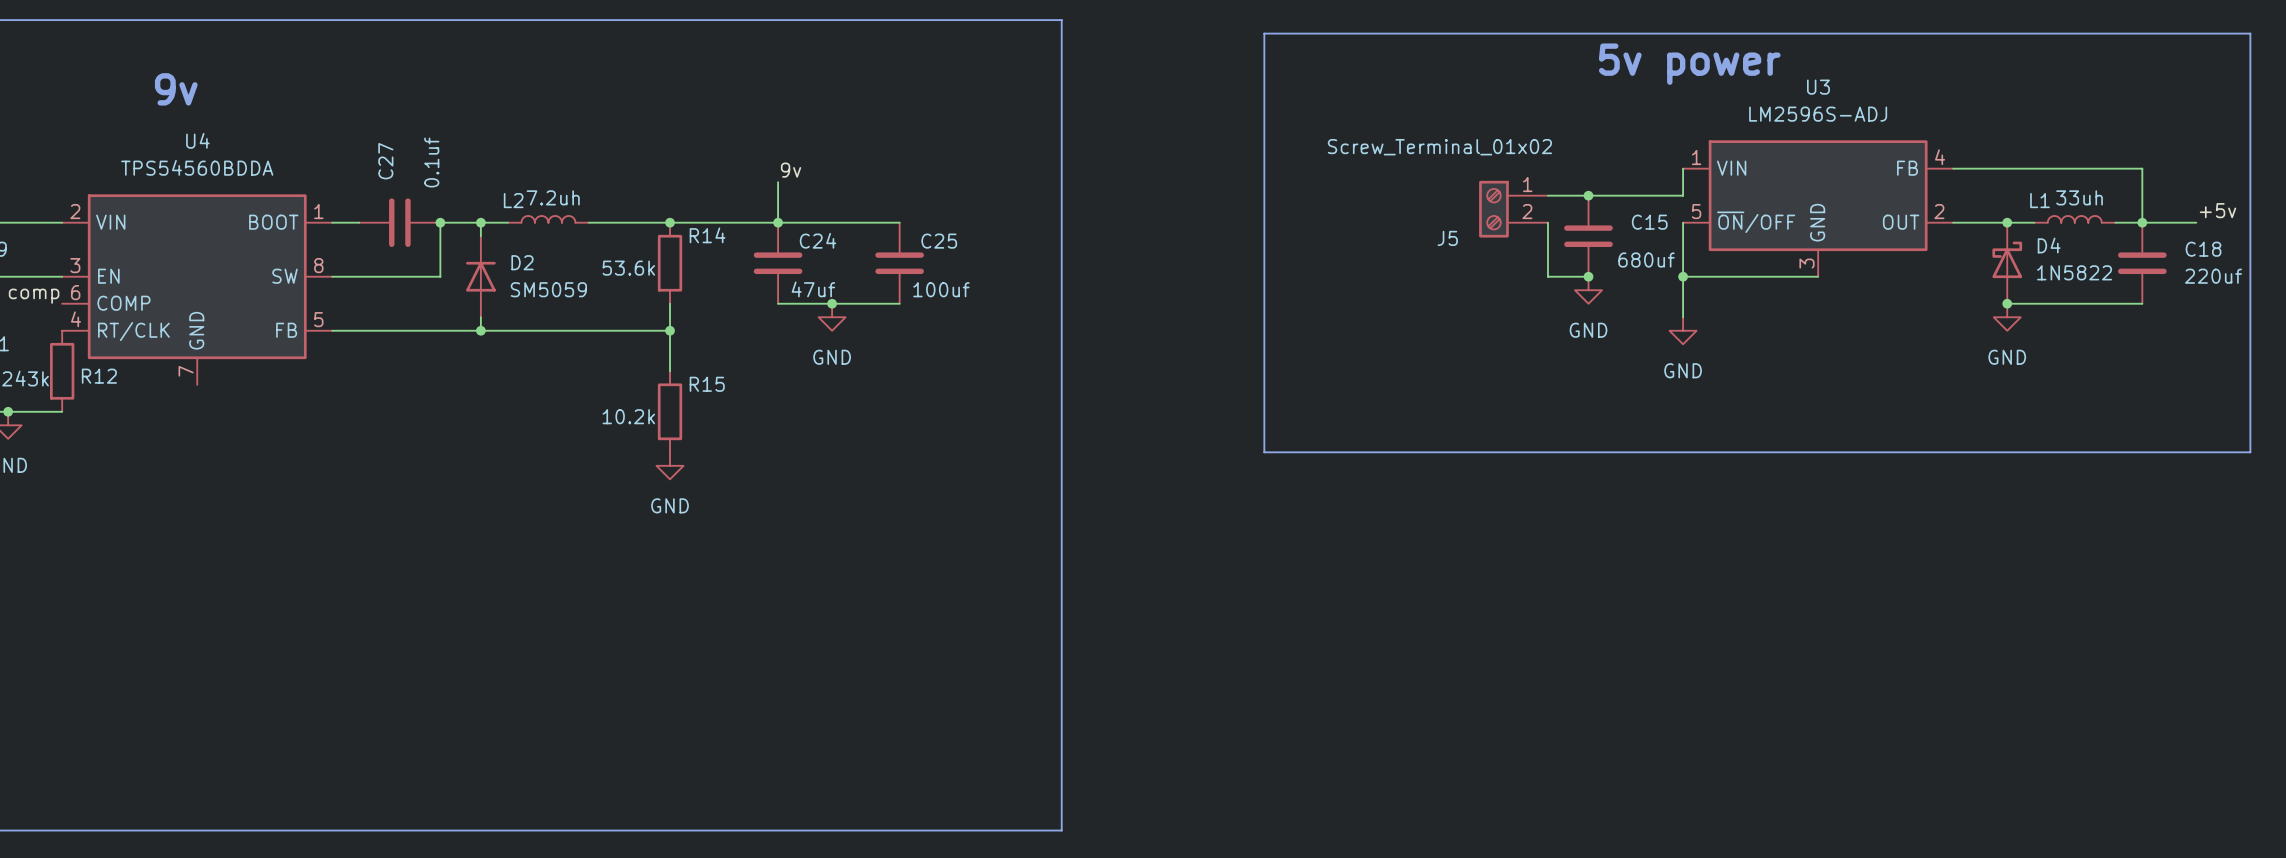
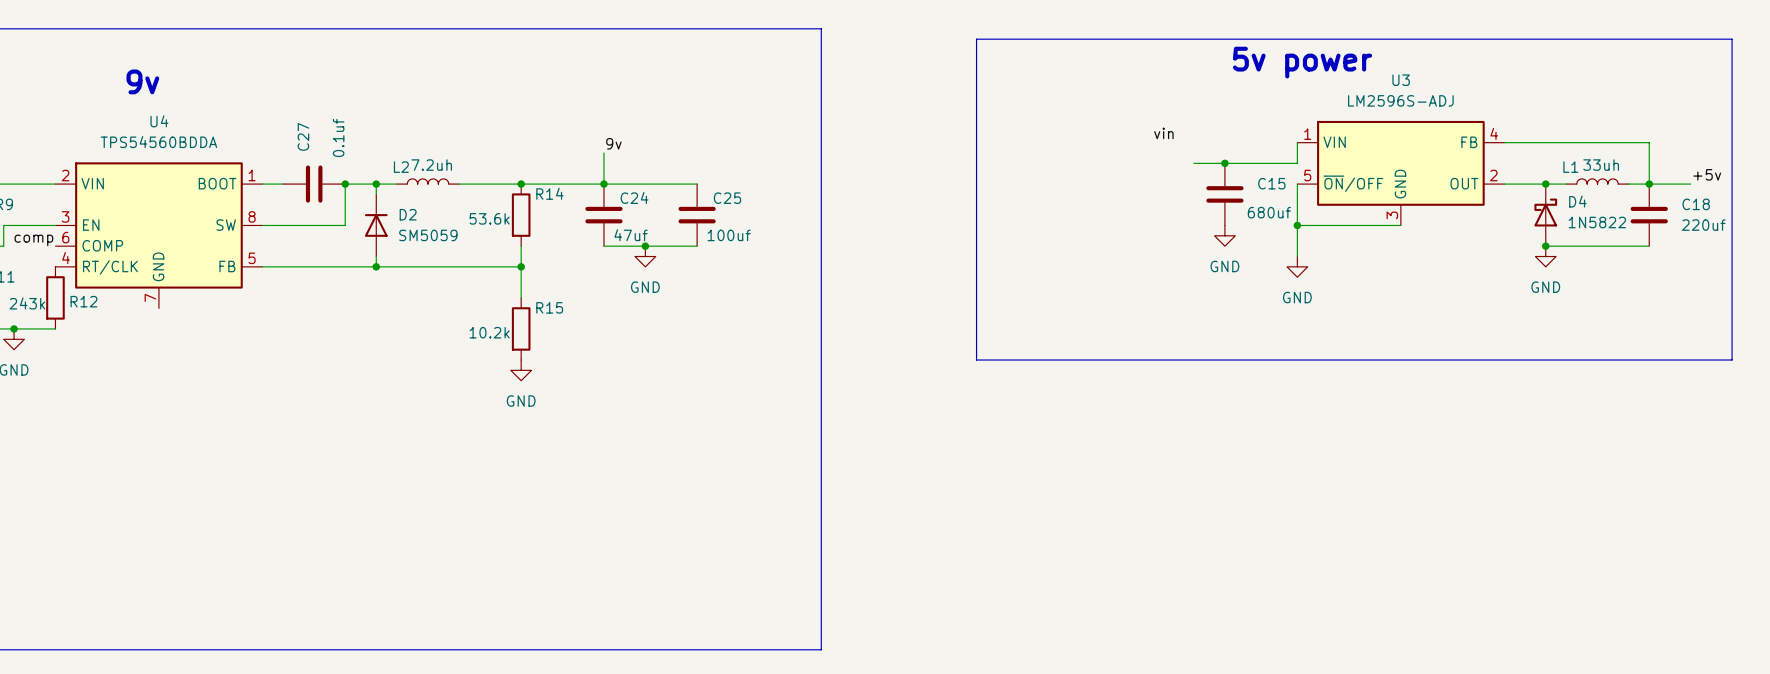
label: none -> vin (1163, 133)
J5: Screw_Terminal_01x02 (1513, 209) -> none
wire: (1547, 222) (1547, 276) (1588, 276) -> none
junction: (1588, 276) -> none

